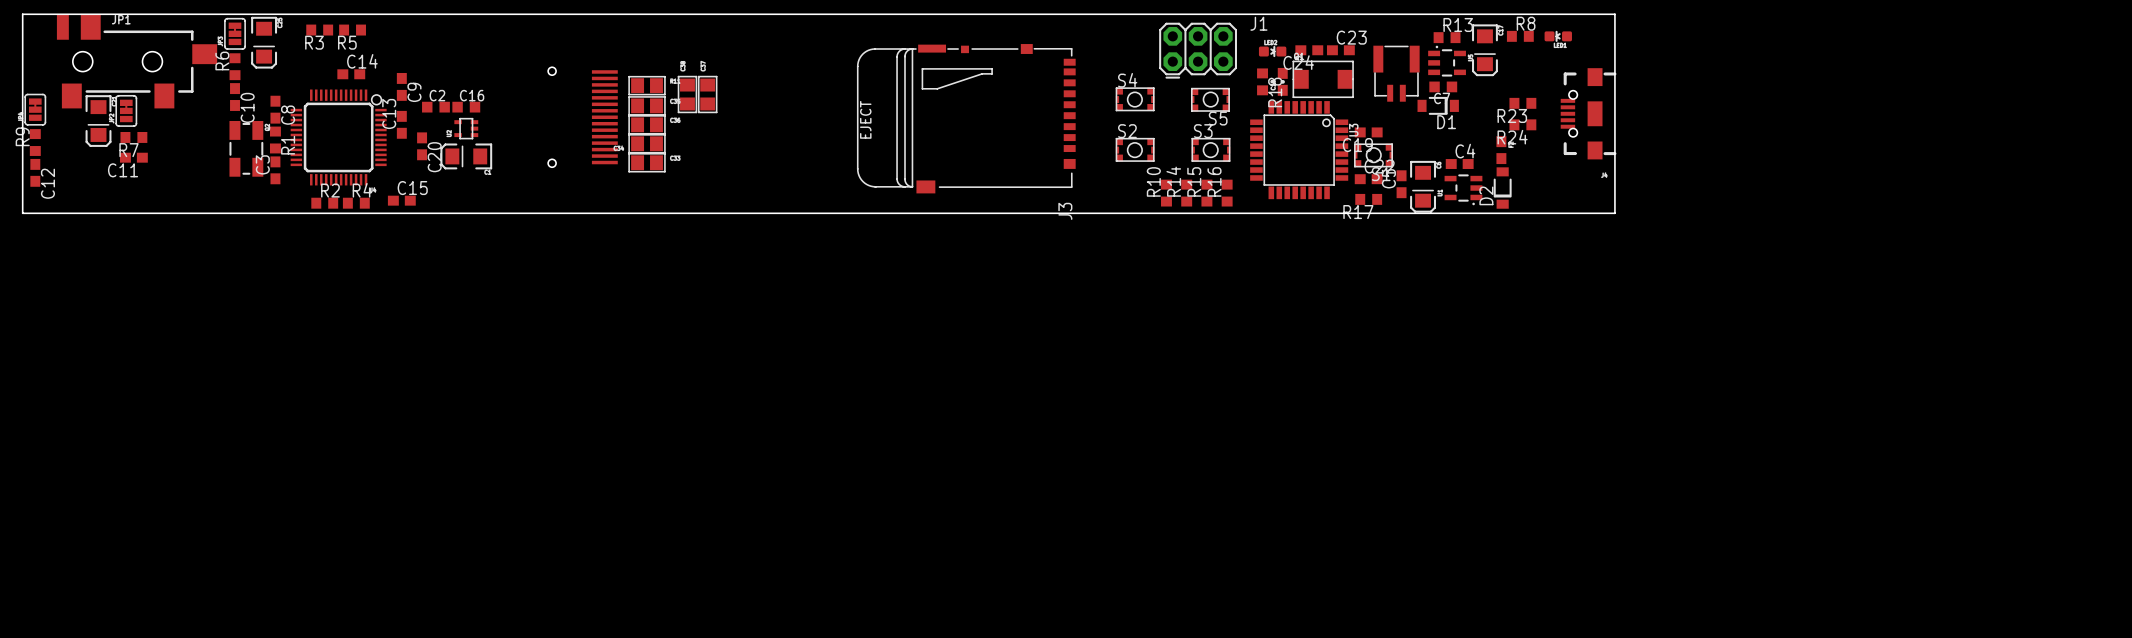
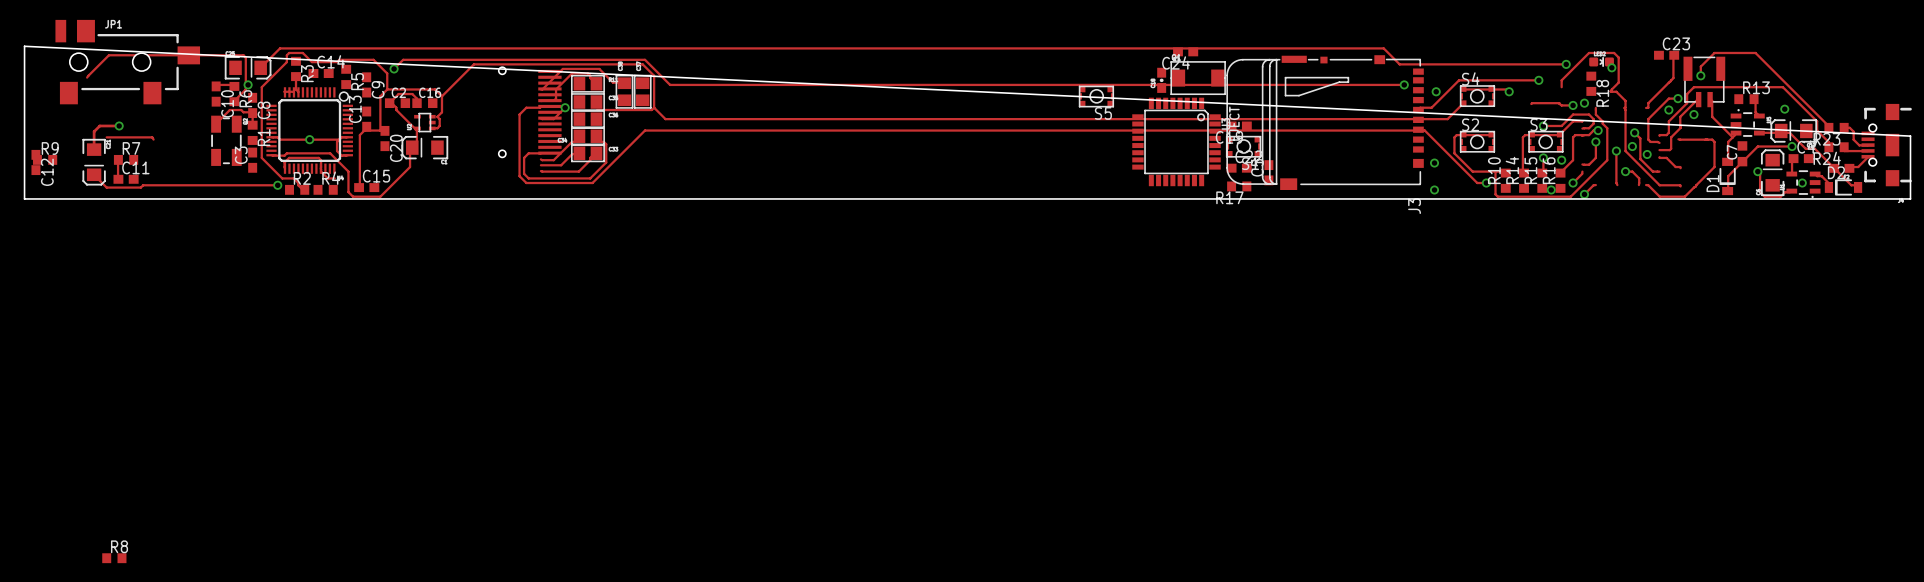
R3 rotation: 0° (319, 30) -> 90° clockwise (295, 68)
R3 position: (319, 30) -> (295, 68)
R5 rotation: 0° (352, 30) -> 90° clockwise (346, 76)
R5 position: (352, 30) -> (346, 76)
part: (235, 33) -> none
R8 position: (1520, 36) -> (114, 558)
part: (1558, 36) -> none
R13 position: (1447, 37) -> (1746, 99)
part rotation: 0° (264, 42) -> 90° counterclockwise (248, 67)
R3 name position: R3 (314, 42) -> R3 (307, 73)
R5 name position: R5 (347, 42) -> R5 (357, 81)
board edge: (22, 44) (22, 14) (1614, 14) (1614, 213) -> (24, 46) (1910, 136) (1910, 198) (1461, 198)
J1: (1198, 50) -> none
C23 position: (1340, 50) -> (1666, 55)
part rotation: 0° (1484, 50) -> 90° clockwise (1793, 130)
part position: (1484, 50) -> (1793, 130)
part position: (1272, 51) -> (1601, 61)
track: none -> (1674, 55) (1673, 78) (1648, 103) (1648, 107) (1646, 107)
R6 name position: R6 (222, 60) -> R6 (245, 98)
part position: (1447, 61) -> (1747, 122)
track: none -> (1566, 64) (1399, 64) (1383, 48) (280, 48) (260, 67)
via: none -> (1566, 64)
R6 position: (235, 66) -> (234, 94)
via: none -> (1611, 67)
track: none -> (394, 68) (403, 59) (645, 59) (670, 84) (1404, 84)
via: none -> (394, 68)
part: (1396, 73) -> none
track: none -> (1700, 75) (1700, 66) (1714, 52) (1755, 52) (1828, 127)
via: none -> (1700, 75)
track: none -> (295, 76) (295, 89) (298, 92)
track: none -> (87, 77) (108, 55) (243, 55) (245, 57) (245, 89) (234, 101)
R18 position: (1262, 81) -> (1591, 83)
track: none -> (1538, 80) (1459, 80) (1431, 107) (1420, 107) (1418, 109)
via: none -> (1538, 80)
part: none -> (1704, 81)
track: none -> (596, 83) (587, 73) (572, 73) (556, 89) (556, 98) (553, 100) (540, 101)
track: none -> (624, 83) (613, 82) (599, 68) (562, 68) (540, 89)
via: none -> (248, 84)
C7 rotation: 0° (1443, 86) -> 90° clockwise (1742, 153)
C7 position: (1443, 86) -> (1742, 153)
via: none -> (1404, 84)
track: none -> (216, 86) (234, 86)
track: none -> (1561, 87) (1561, 80) (1589, 52) (1614, 52) (1618, 57) (1618, 82) (1610, 91) (1616, 91) (1625, 100) (1625, 151) (1659, 185) (1680, 186)
track: none -> (387, 89) (435, 89) (441, 96)
track: none -> (387, 89) (380, 96) (380, 130)
track: none -> (387, 89) (387, 73) (373, 59) (311, 62) (302, 52) (289, 52) (286, 55) (286, 62) (261, 87) (261, 157) (282, 178) (293, 178) (304, 189)
track: none -> (1463, 88) (1506, 89) (1509, 91)
via: none -> (1436, 91)
via: none -> (1509, 91)
track: none -> (284, 92) (293, 92)
track: none -> (441, 96) (441, 112) (437, 116) (439, 119) (439, 125) (432, 128)
track: none -> (441, 96) (473, 64) (642, 64) (654, 75) (654, 107)
S4 position: (1135, 99) -> (1477, 96)
track: none -> (1678, 98) (1668, 98) (1648, 119) (1648, 139) (1650, 141) (1659, 142)
via: none -> (1678, 98)
track: none -> (1754, 99) (1755, 112) (1759, 116)
R23 position: (1522, 103) -> (1836, 127)
track: none -> (1698, 99) (1680, 116) (1680, 127) (1671, 137) (1671, 148) (1659, 150)
track: none -> (1710, 99) (1712, 100) (1712, 116) (1732, 137)
D1 rotation: 0° (1438, 105) -> 90° clockwise (1727, 176)
D1 position: (1438, 105) -> (1727, 176)
track: none -> (417, 103) (416, 98) (412, 94) (398, 94) (389, 103) (396, 107) (396, 110) (416, 130)
via: none -> (1584, 103)
track: none -> (1531, 103) (1559, 103) (1561, 105) (1573, 105)
part: (35, 109) -> none
track: none -> (1461, 105) (1447, 119) (1418, 119) (665, 119) (654, 107)
via: none -> (1573, 105)
part: (126, 110) -> none
track: none -> (540, 106) (526, 107) (519, 114) (519, 176) (526, 183) (592, 183) (645, 130) (1418, 129) (1424, 130) (1477, 183) (1486, 183)
track: none -> (565, 107) (553, 119) (540, 118)
via: none -> (565, 107)
track: none -> (654, 107) (651, 110) (597, 110)
track: none -> (1595, 107) (1595, 114) (1607, 128) (1607, 160) (1570, 196) (1497, 196) (1495, 194) (1495, 171)
part position: (1588, 113) -> (1886, 145)
via: none -> (1784, 109)
via: none -> (1668, 110)
J3 position: (966, 118) -> (1325, 122)
via: none -> (1693, 114)
part position: (98, 121) -> (94, 162)
R24 position: (1522, 124) -> (1836, 147)
track: none -> (1582, 121) (1573, 121) (1559, 135) (1525, 135) (1522, 137) (1524, 173)
track: none -> (216, 124) (229, 110) (241, 110) (243, 112) (252, 112) (252, 125)
track: none -> (119, 125) (99, 125) (94, 131) (94, 149)
via: none -> (119, 125)
track: none -> (1543, 125) (1561, 125) (1573, 114) (1589, 114) (1593, 119) (1593, 123) (1589, 128) (1582, 128)
via: none -> (1543, 125)
track: none -> (1844, 127) (1849, 127) (1853, 131) (1853, 139) (1859, 145) (1868, 145)
track: none -> (417, 128) (416, 141) (410, 148) (410, 167) (380, 196) (353, 196) (348, 192) (348, 171) (330, 153) (271, 155)
R7 position: (133, 137) -> (126, 159)
track: none -> (384, 130) (384, 130) (364, 130) (366, 126) (359, 135) (359, 187)
track: none -> (1598, 130) (1593, 130) (1589, 135) (1575, 135) (1573, 137) (1573, 160) (1560, 173)
via: none -> (1598, 130)
track: none -> (1634, 132) (1640, 138) (1640, 159) (1652, 171) (1659, 171)
via: none -> (1634, 132)
track: none -> (1736, 133) (1728, 141) (1727, 161)
track: none -> (1759, 133) (1780, 132) (1781, 130) (1789, 132) (1805, 148) (1814, 148) (1851, 185) (1858, 187)
track: none -> (1491, 134) (1456, 135) (1454, 137) (1454, 153) (1472, 171) (1505, 173)
R9 rotation: 0° (35, 142) -> 90° clockwise (45, 159)
R9 position: (35, 142) -> (45, 159)
track: none -> (579, 136) (553, 160) (540, 159)
track: none -> (596, 136) (606, 144) (606, 162) (590, 178) (528, 178) (524, 173) (524, 157) (528, 153) (540, 153)
track: none -> (1659, 135) (1666, 135) (1668, 132) (1668, 121) (1687, 103) (1687, 94) (1693, 87) (1782, 87) (1817, 121) (1817, 130) (1828, 141) (1828, 147)
track: none -> (271, 137) (277, 137) (280, 139) (339, 139)
track: none -> (347, 137) (341, 137) (337, 141) (337, 151) (341, 155) (347, 155)
track: none -> (106, 137) (152, 137) (153, 139)
via: none -> (309, 139)
track: none -> (1678, 139) (1712, 139) (1714, 141) (1714, 167) (1684, 196) (1659, 196) (1646, 185)
S2 position: (1135, 149) -> (1477, 141)
S3 position: (1210, 149) -> (1545, 141)
R7 name position: R7 (128, 150) -> R7 (131, 148)
part rotation: 0° (1501, 150) -> 90° clockwise (1841, 168)
part position: (1501, 150) -> (1841, 168)
track: none -> (1595, 141) (1595, 157) (1589, 164) (1582, 164)
via: none -> (1595, 141)
via: none -> (1632, 146)
track: none -> (1792, 146) (1757, 146) (1728, 176) (1727, 191)
via: none -> (1792, 146)
track: none -> (1844, 147) (1844, 151) (1868, 150)
C11 position: (133, 157) -> (126, 179)
track: none -> (1616, 151) (1617, 185)
via: none -> (1616, 151)
track: none -> (579, 153) (572, 154) (561, 165) (540, 165)
track: none -> (596, 153) (578, 171) (540, 171)
C4 position: (1459, 164) -> (1801, 158)
via: none -> (1647, 154)
track: none -> (1868, 156) (1858, 167) (1849, 168)
track: none -> (1543, 157) (1542, 173)
via: none -> (1543, 157)
track: none -> (1659, 157) (1666, 157) (1675, 167) (1680, 168)
track: none -> (1793, 158) (1791, 174)
C11 name position: C11 (123, 170) -> C11 (135, 167)
track: none -> (118, 159) (118, 179)
via: none -> (1561, 160)
via: none -> (1434, 163)
track: none -> (284, 168) (284, 162) (289, 157) (318, 157) (321, 160) (321, 171) (327, 178) (334, 178)
track: none -> (1625, 171) (1632, 171) (1639, 178) (1638, 185)
via: none -> (1625, 171)
via: none -> (1757, 171)
track: none -> (1760, 171) (1760, 192) (1764, 196) (1780, 196) (1785, 192) (1791, 191)
track: none -> (1582, 171) (1573, 183)
track: none -> (1815, 174) (1821, 176) (1830, 185) (1828, 187)
track: none -> (94, 174) (106, 187) (140, 187) (143, 185) (277, 185)
part rotation: 0° (1423, 186) -> 180° (1772, 172)
part position: (1423, 186) -> (1772, 172)
D2 rotation: 0° (1502, 188) -> 90° clockwise (1843, 187)
D2 position: (1502, 188) -> (1843, 187)
part position: (1463, 189) -> (1803, 184)
R10 position: (1166, 193) -> (1505, 180)
R14 position: (1186, 193) -> (1524, 180)
R15 position: (1206, 193) -> (1542, 180)
R16 position: (1227, 193) -> (1560, 180)
via: none -> (1486, 183)
via: none -> (1573, 183)
via: none -> (1802, 183)
track: none -> (1595, 185) (1584, 194)
via: none -> (277, 185)
via: none -> (1434, 189)
via: none -> (1551, 189)
via: none -> (1584, 194)

